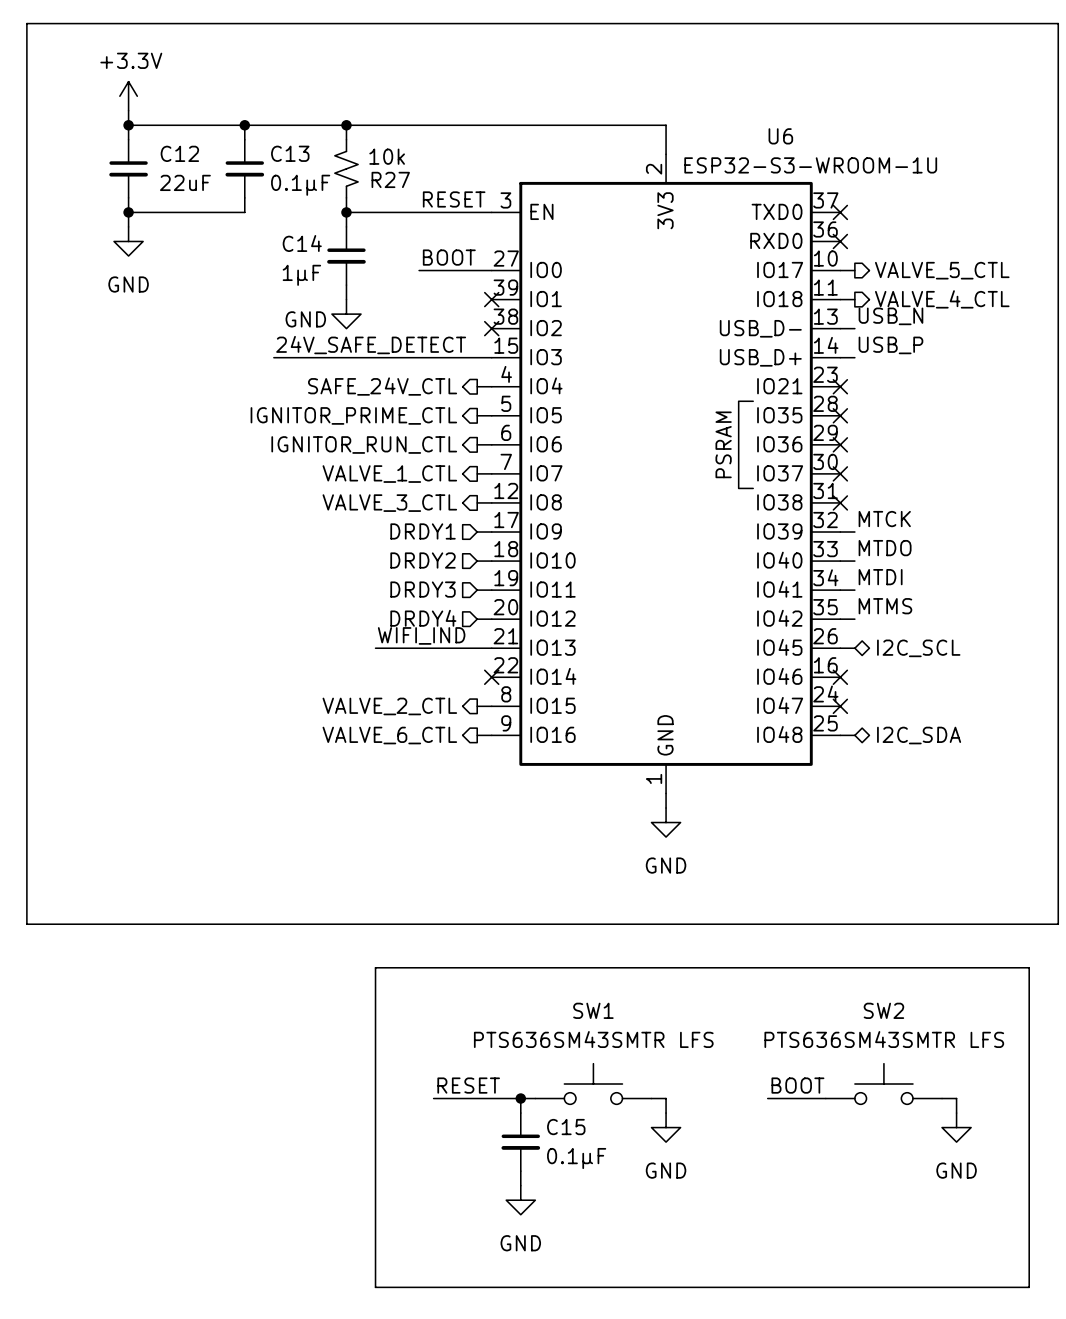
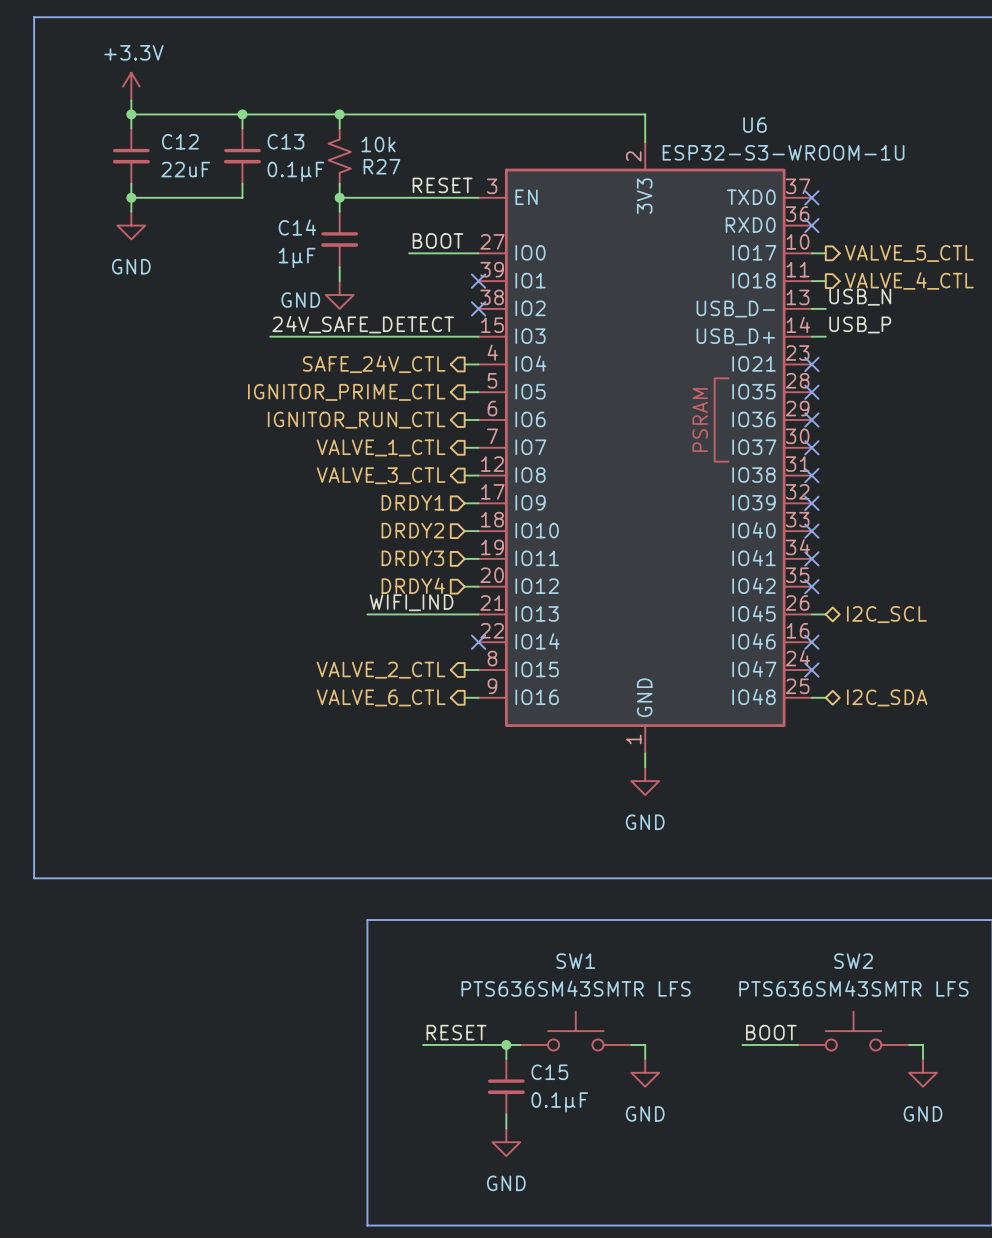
label: MTCK (884, 519) -> none
wire: (840, 532) (854, 532) -> none
no-connect mark: none -> (811, 503)
label: MTDO (885, 548) -> none
wire: (840, 561) (854, 561) -> none
no-connect mark: none -> (811, 531)
label: MTDI (880, 577) -> none
wire: (840, 590) (854, 590) -> none
no-connect mark: none -> (811, 558)
label: MTMS (885, 606) -> none
wire: (840, 619) (854, 619) -> none
no-connect mark: none -> (811, 586)

